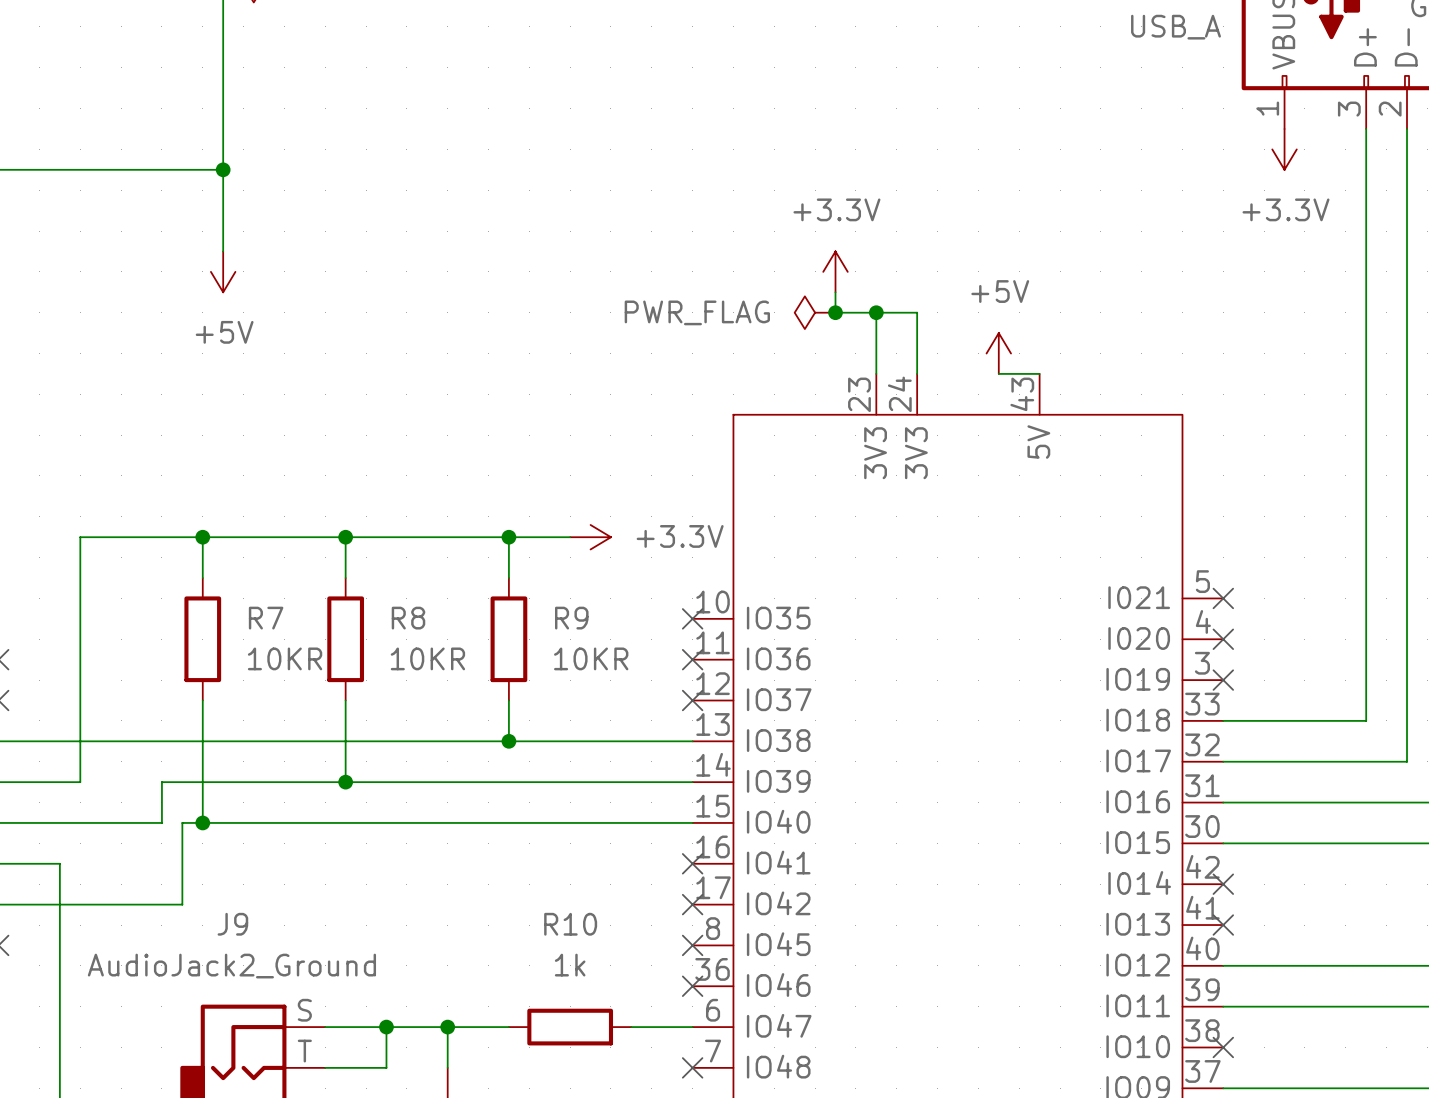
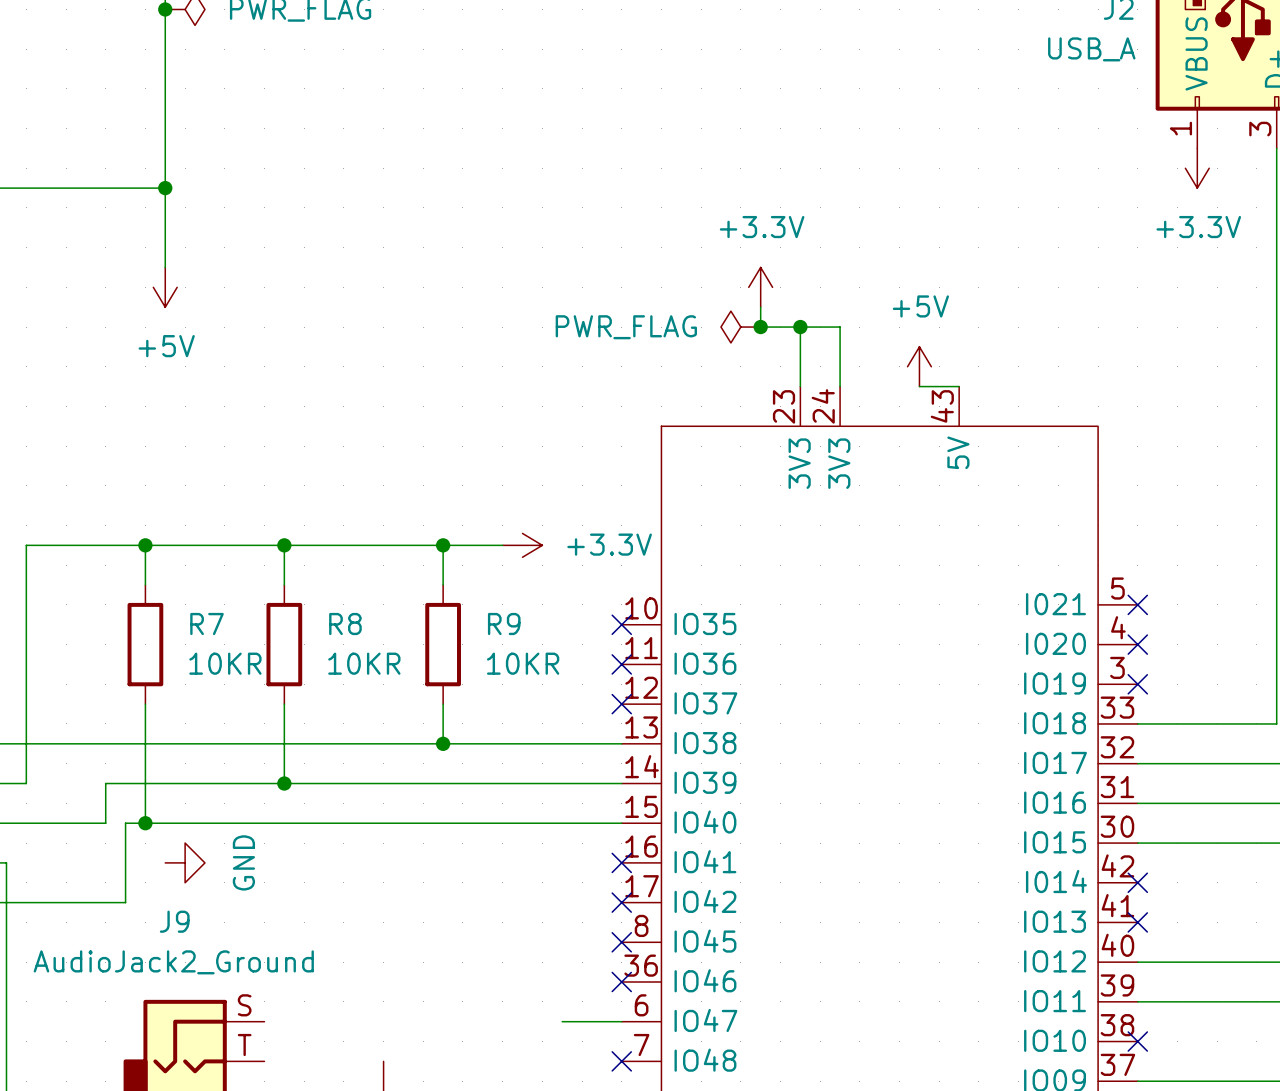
power symbol: none -> GND (185, 862)
wire: (325, 1027) (508, 1027) -> none
wire: (386, 1027) (386, 1067) (325, 1067) -> none
junction: (386, 1027) -> none
wire: (447, 1027) (447, 1067) -> none
junction: (447, 1027) -> none
R10: 1k (570, 1027) -> none

